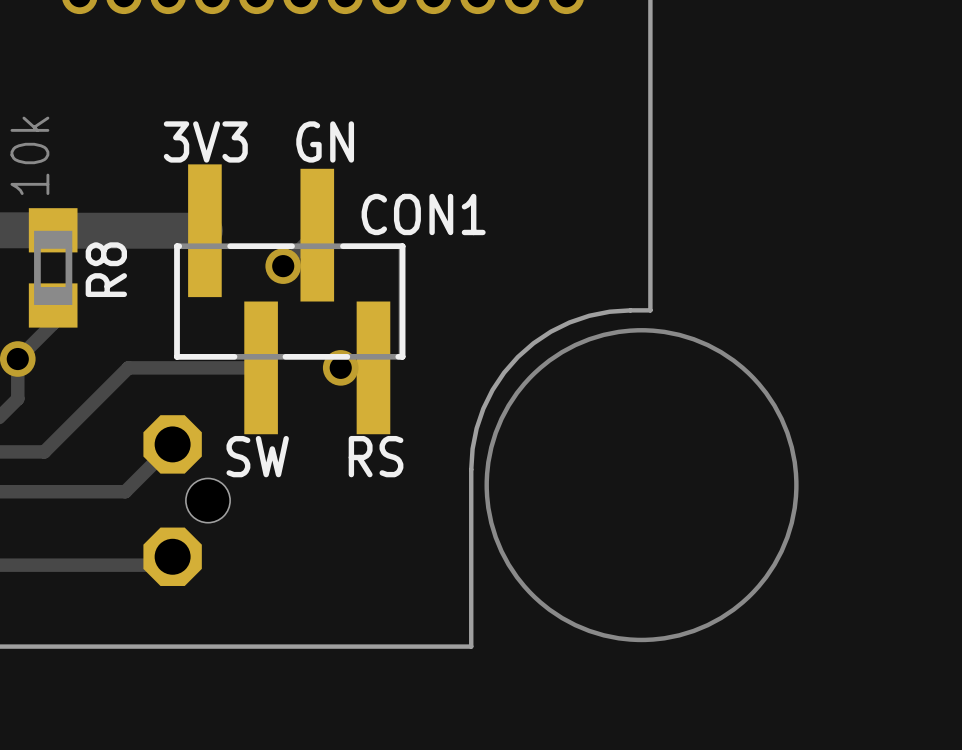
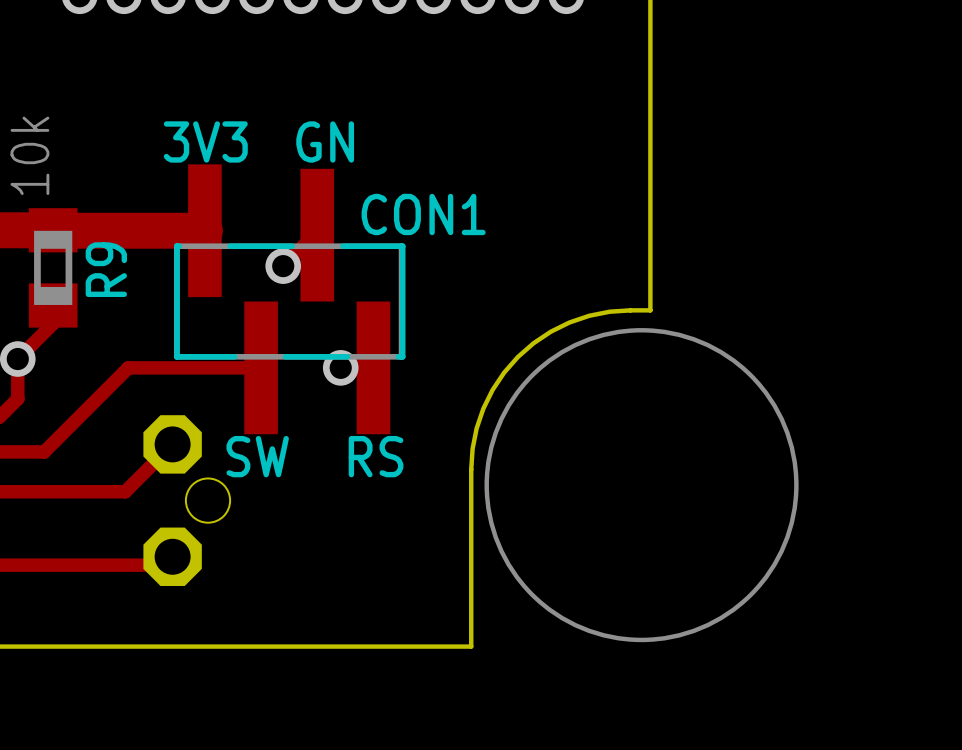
R8 name: R8 (106, 269) -> R9 (106, 269)

